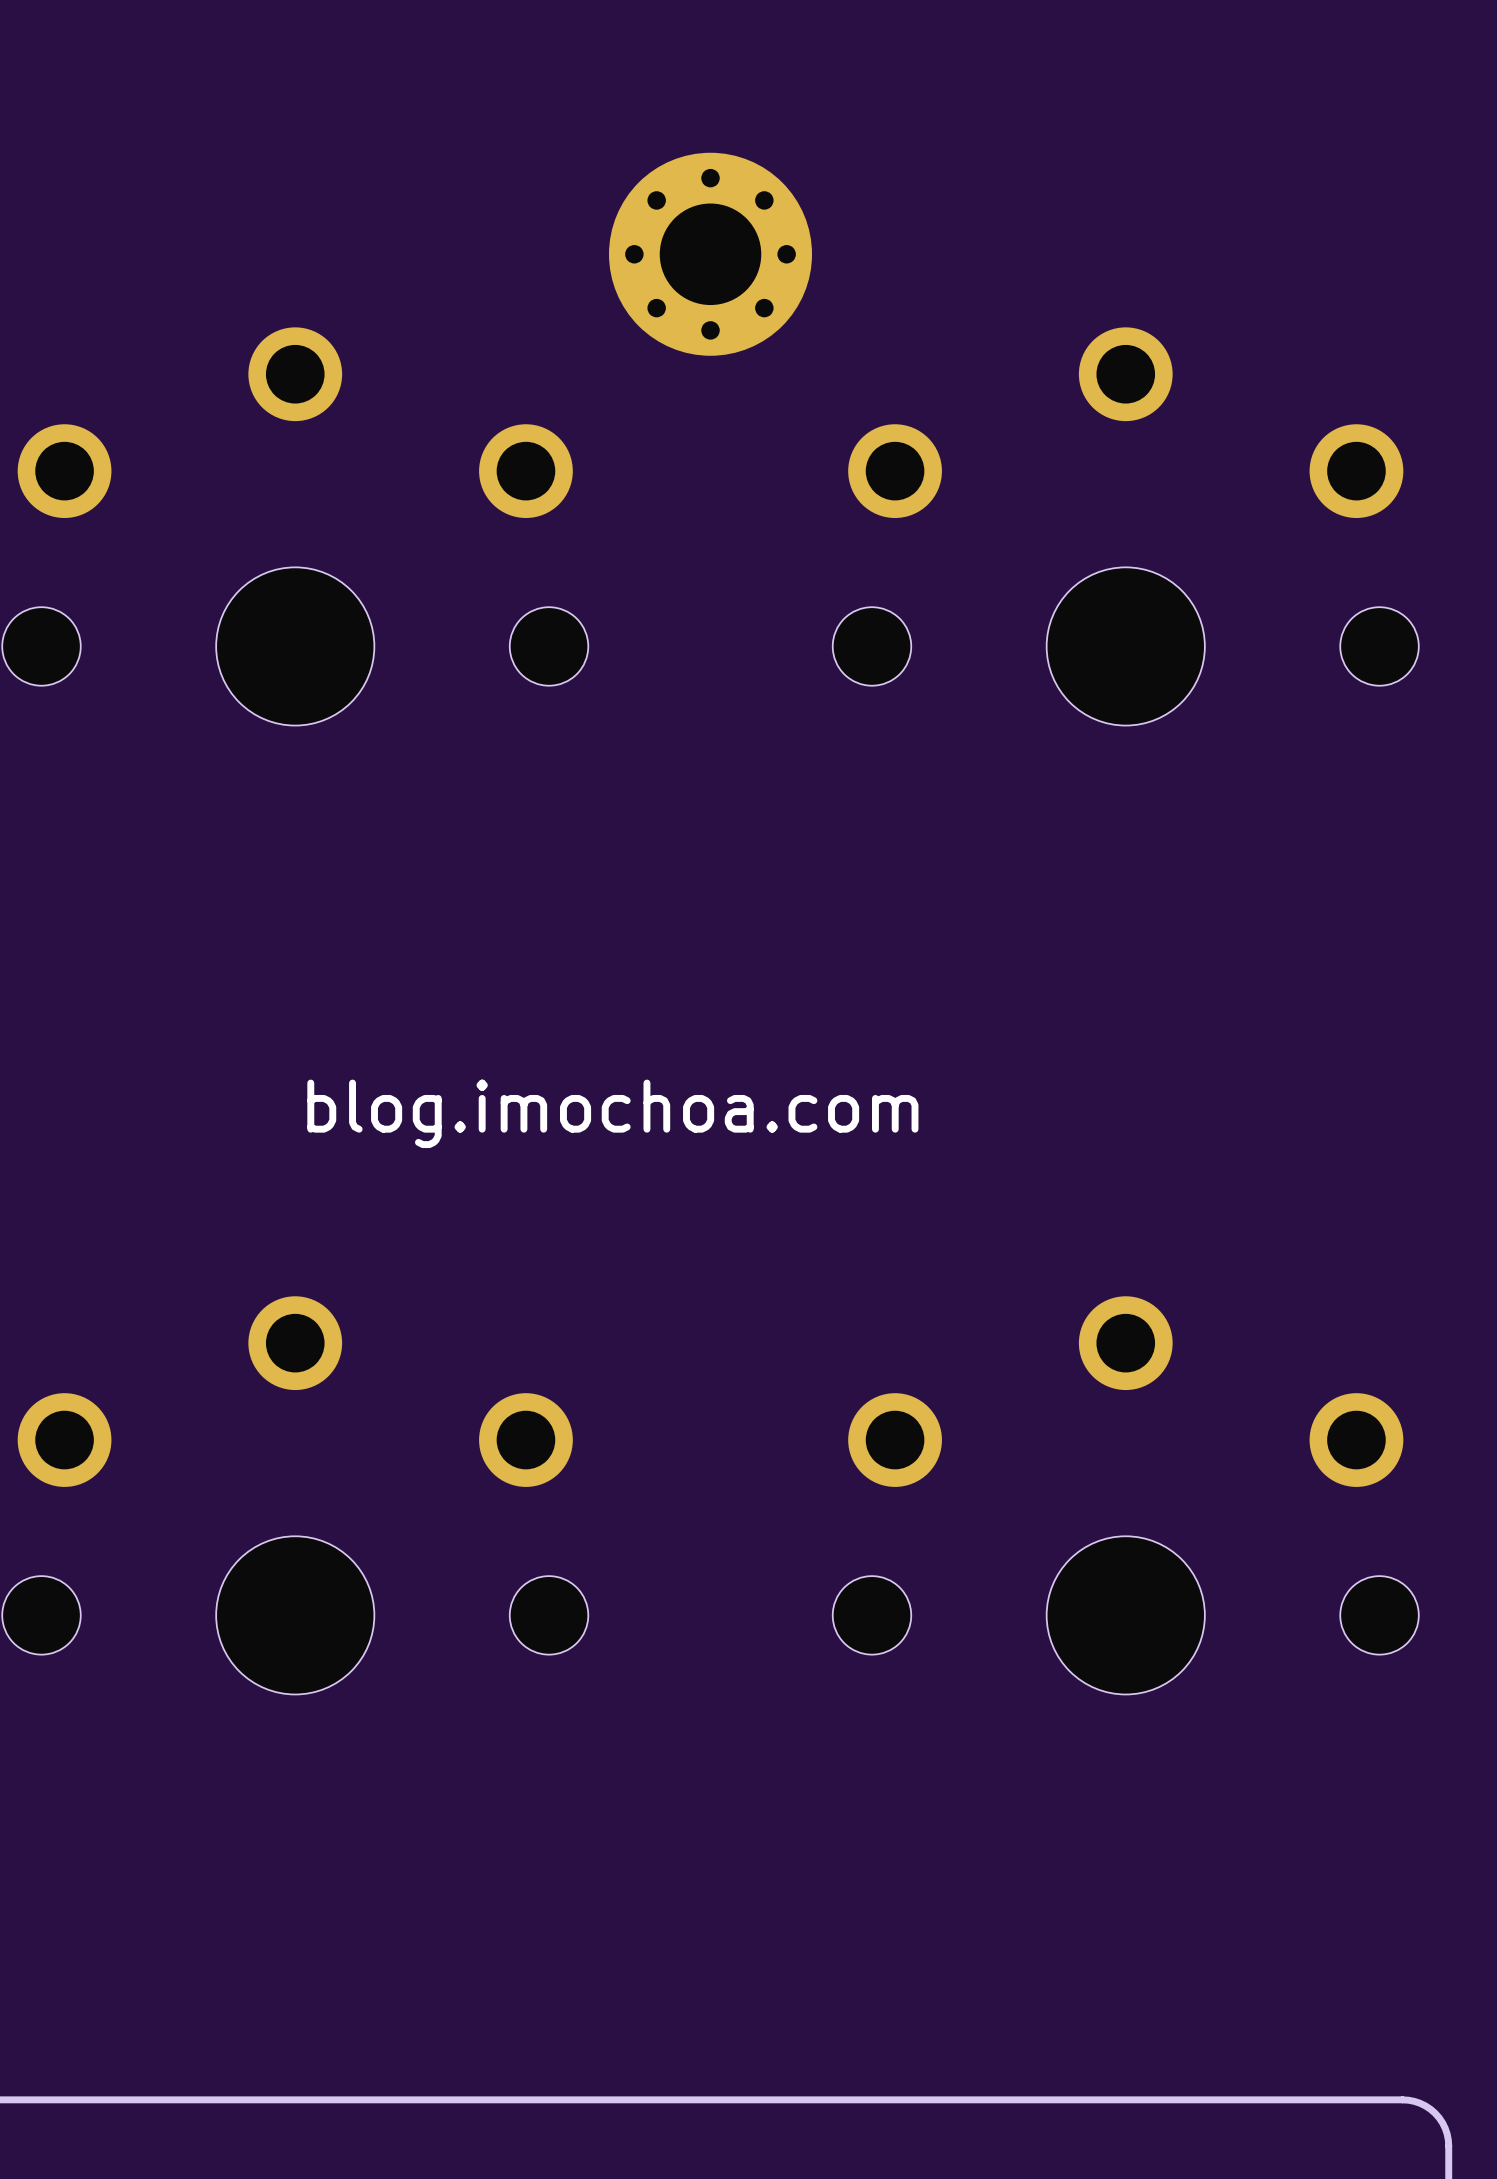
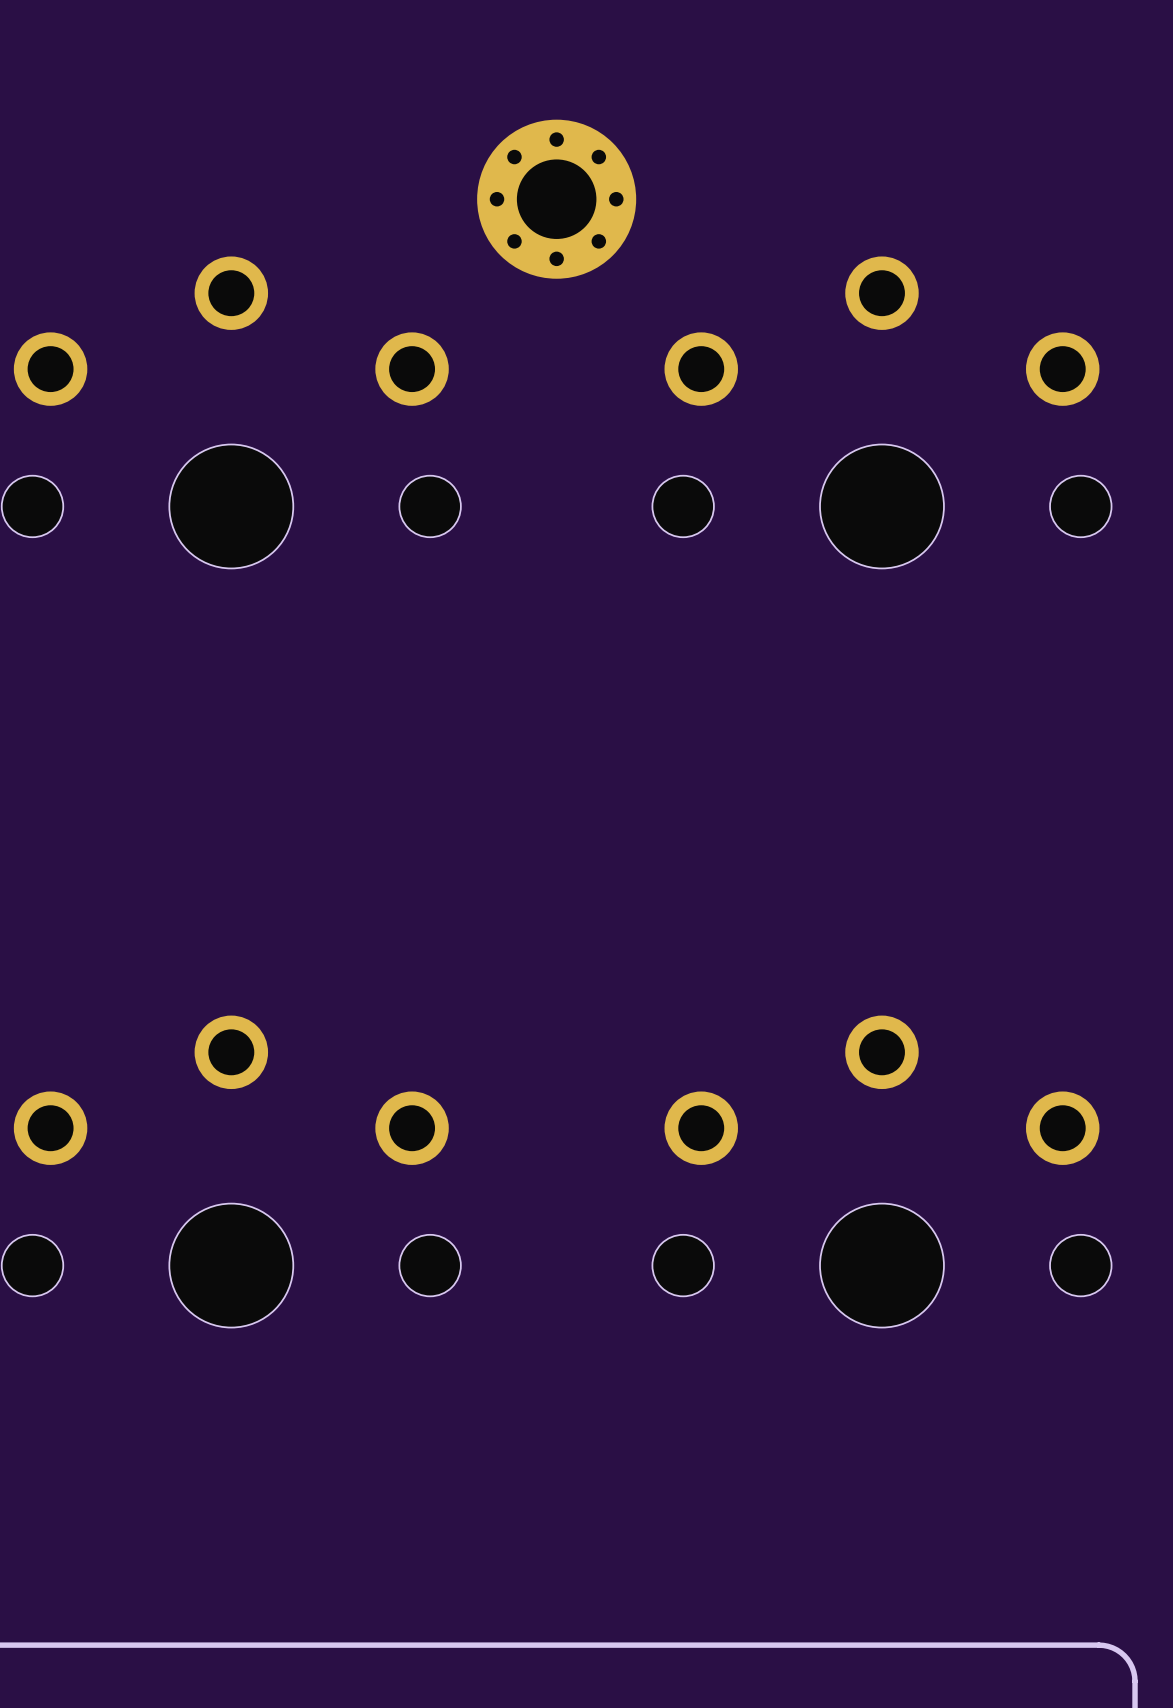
text: blog.imochoa.com (612, 1113) -> none

